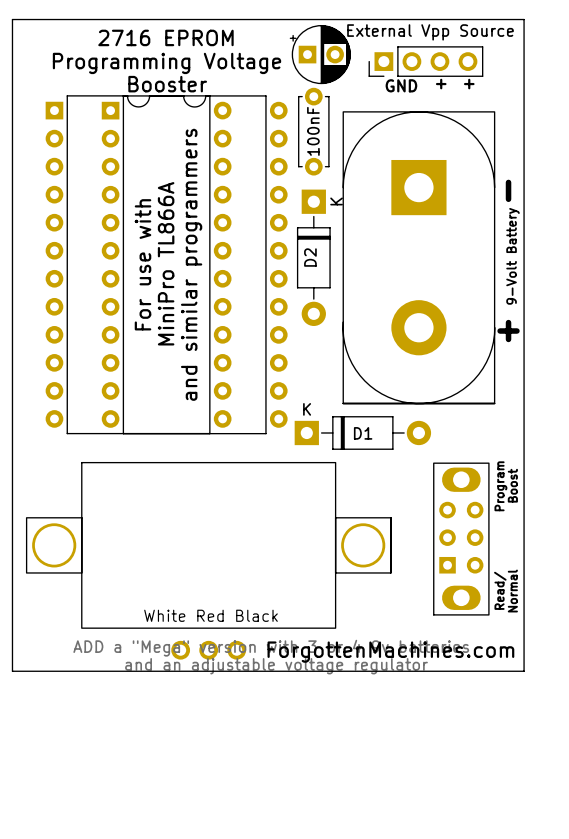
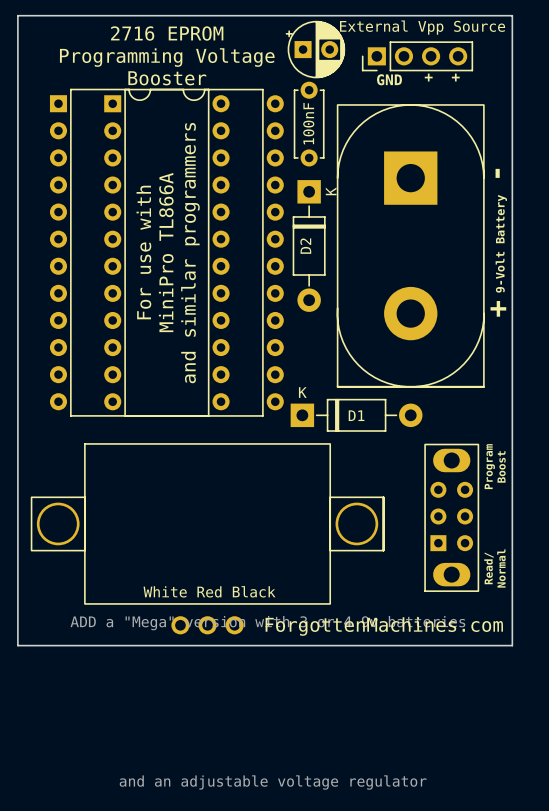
text position: and an adjustable voltage regulator (276, 666) -> and an adjustable voltage regulator (273, 782)

